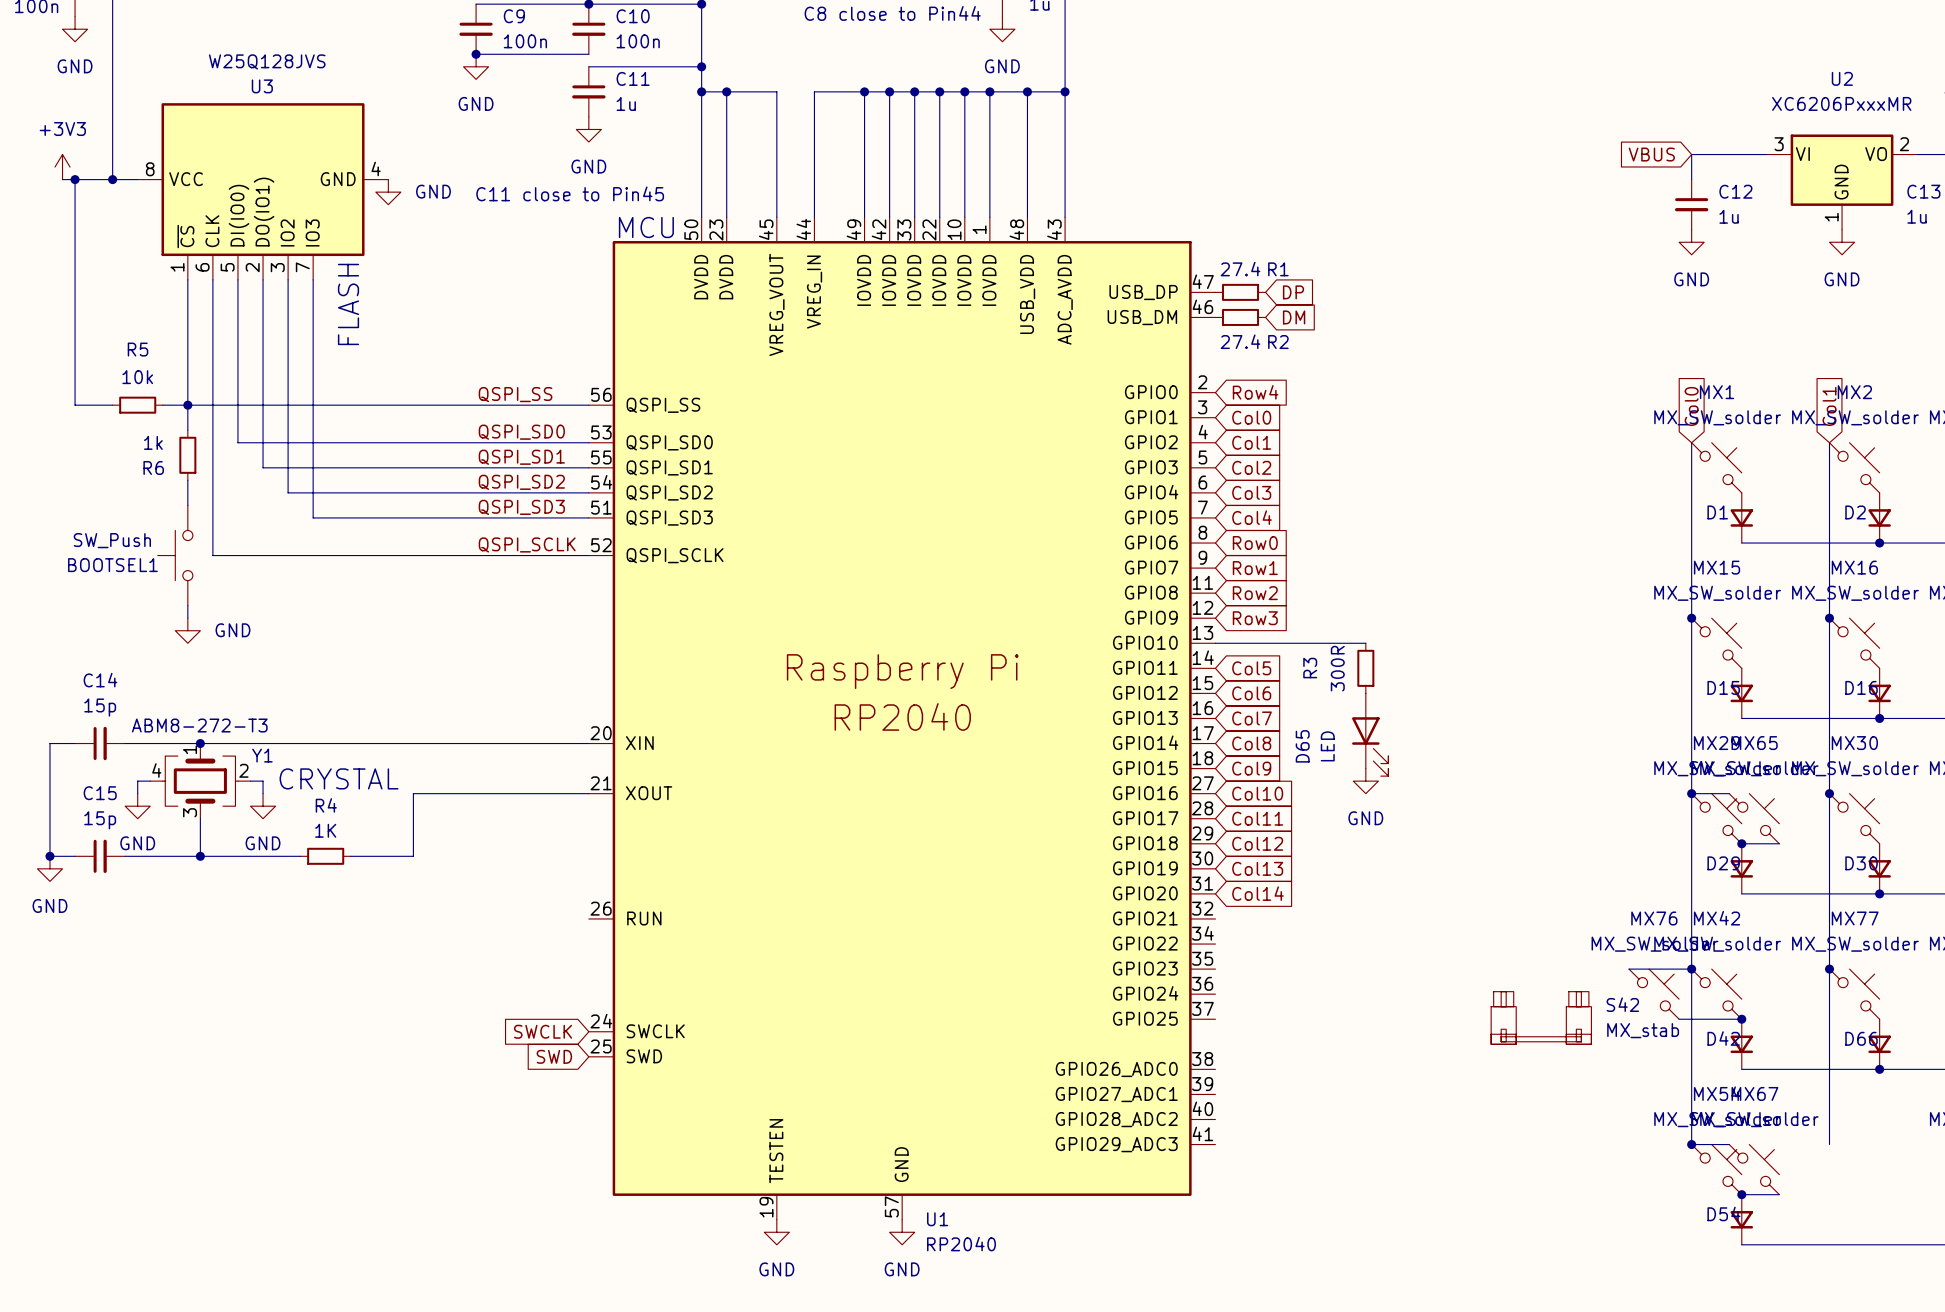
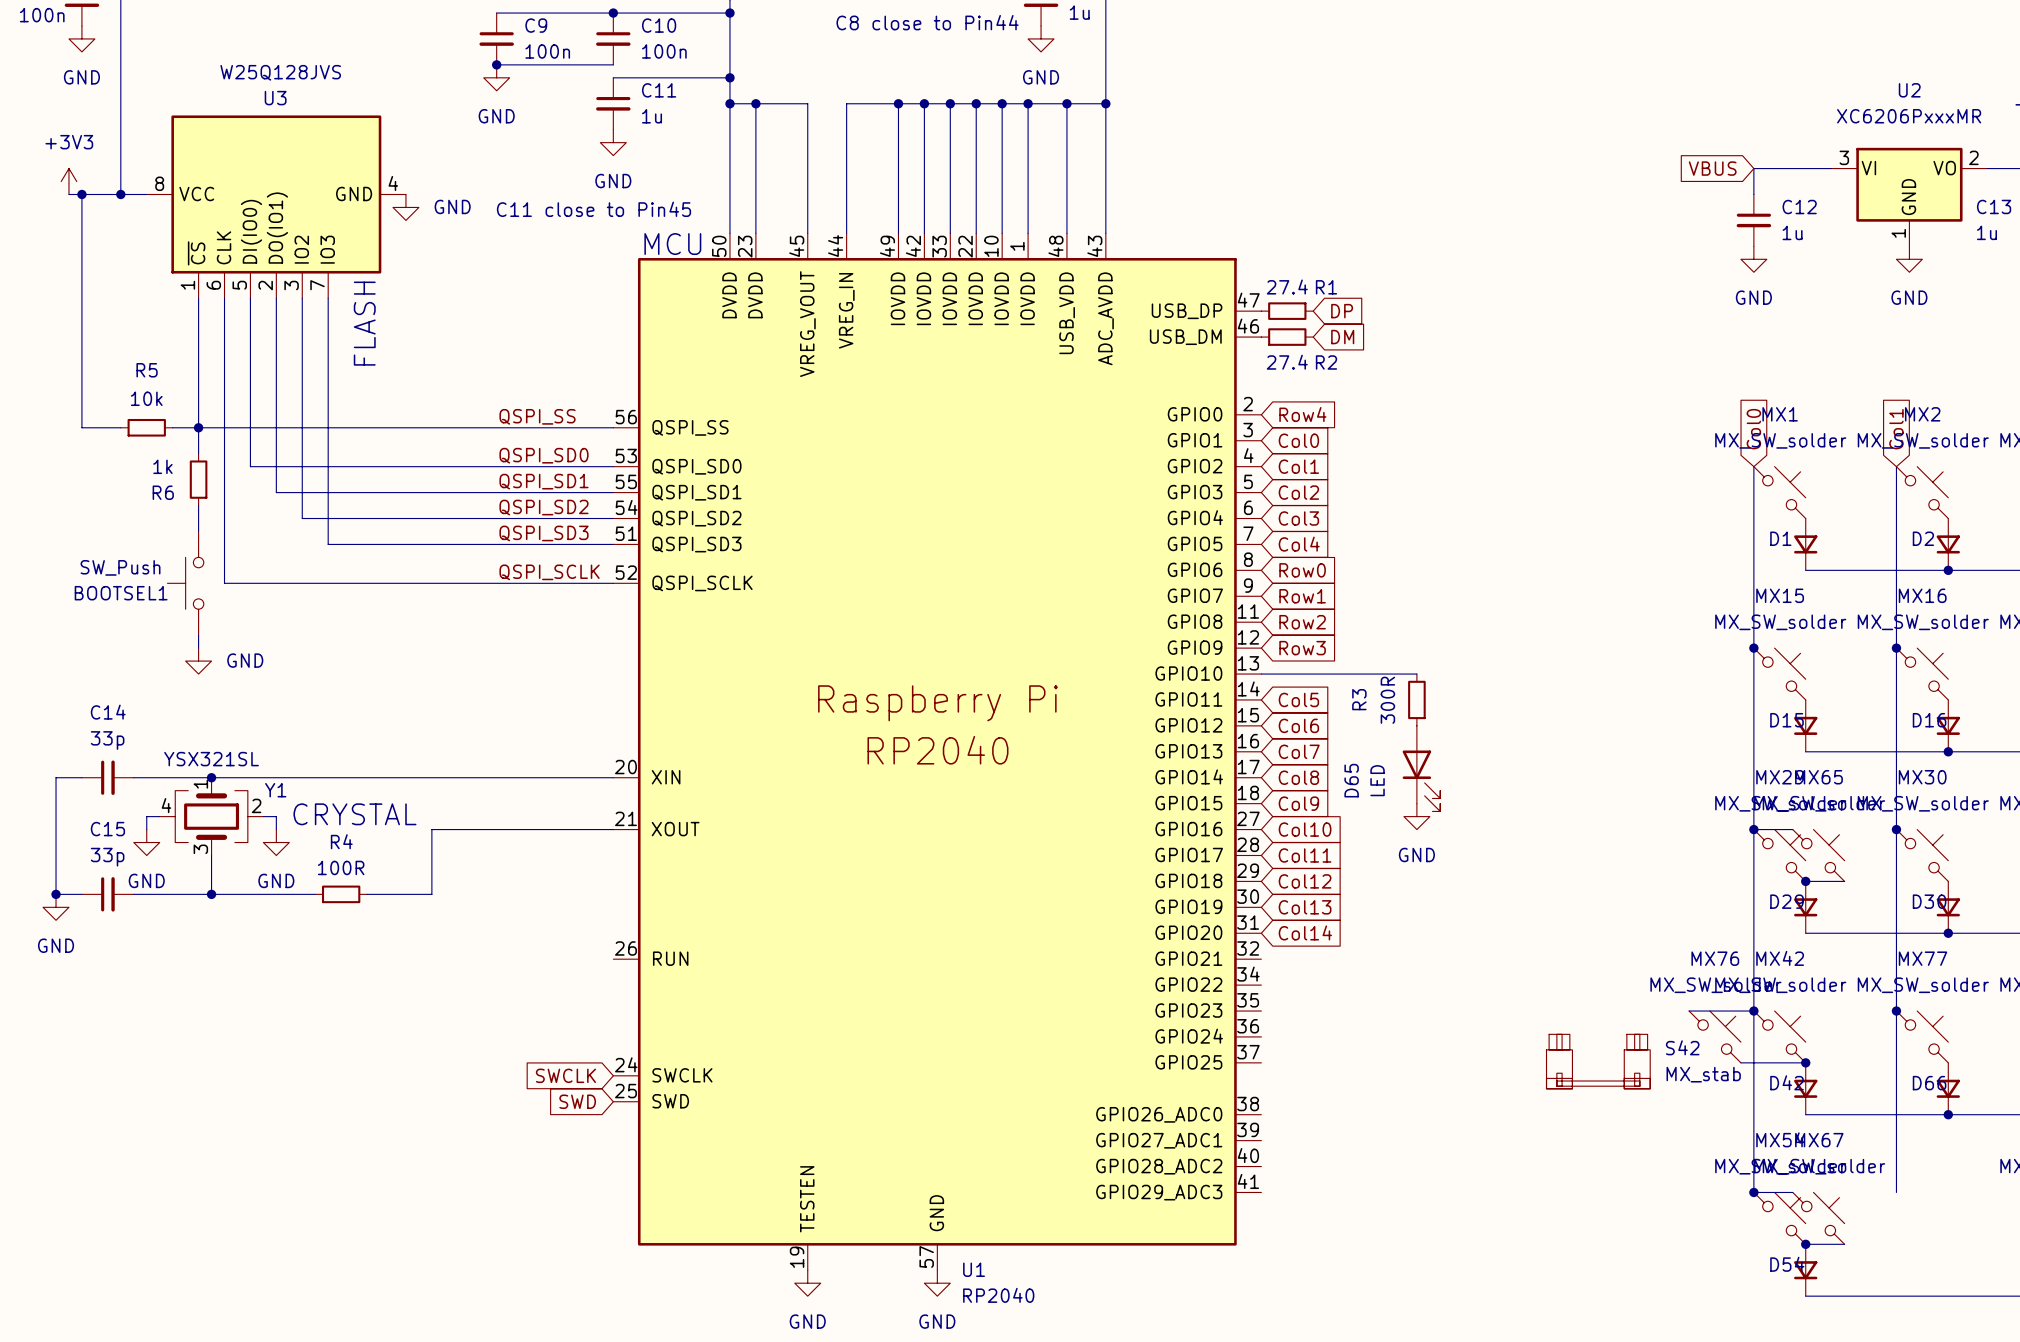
C14 value: 15p (100, 707) -> 33p (107, 740)
Y1 value: ABM8-272-T3 (199, 725) -> YSX321SL (211, 759)
C15 value: 15p (100, 820) -> 33p (107, 857)
R4 value: 1K (325, 830) -> 100R (341, 867)

